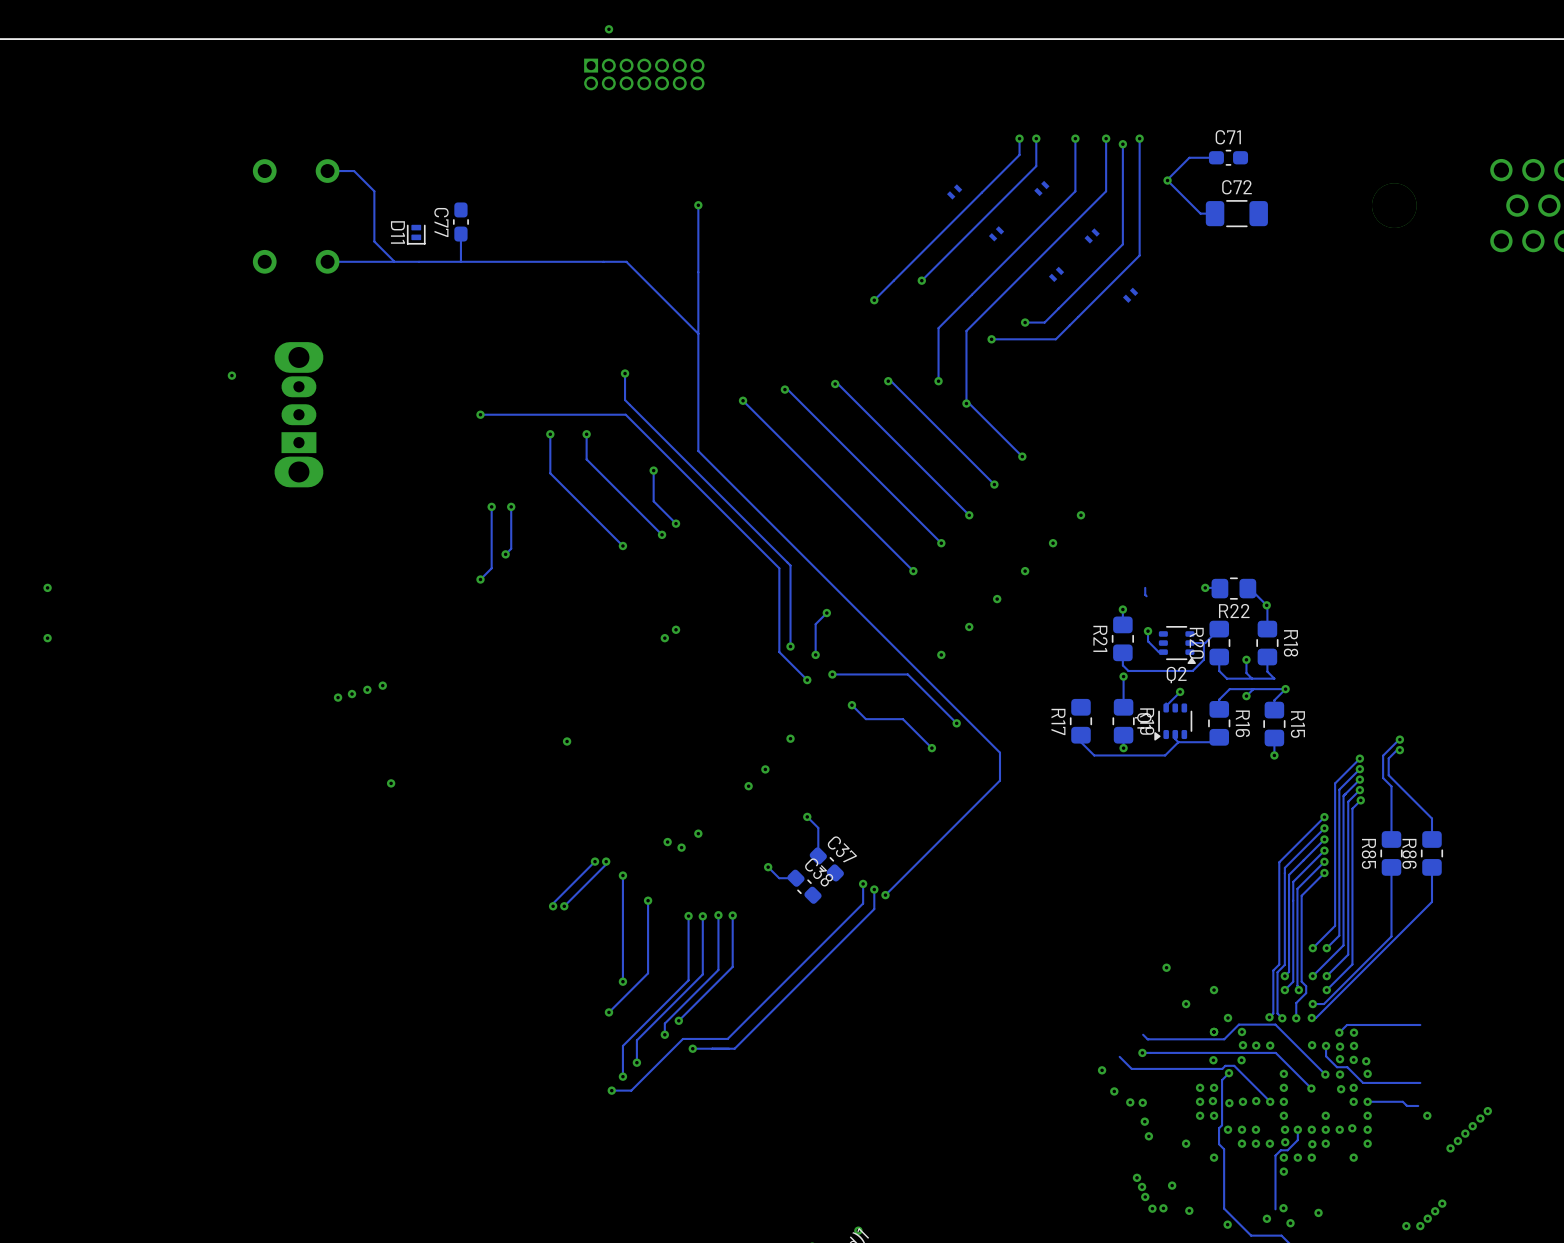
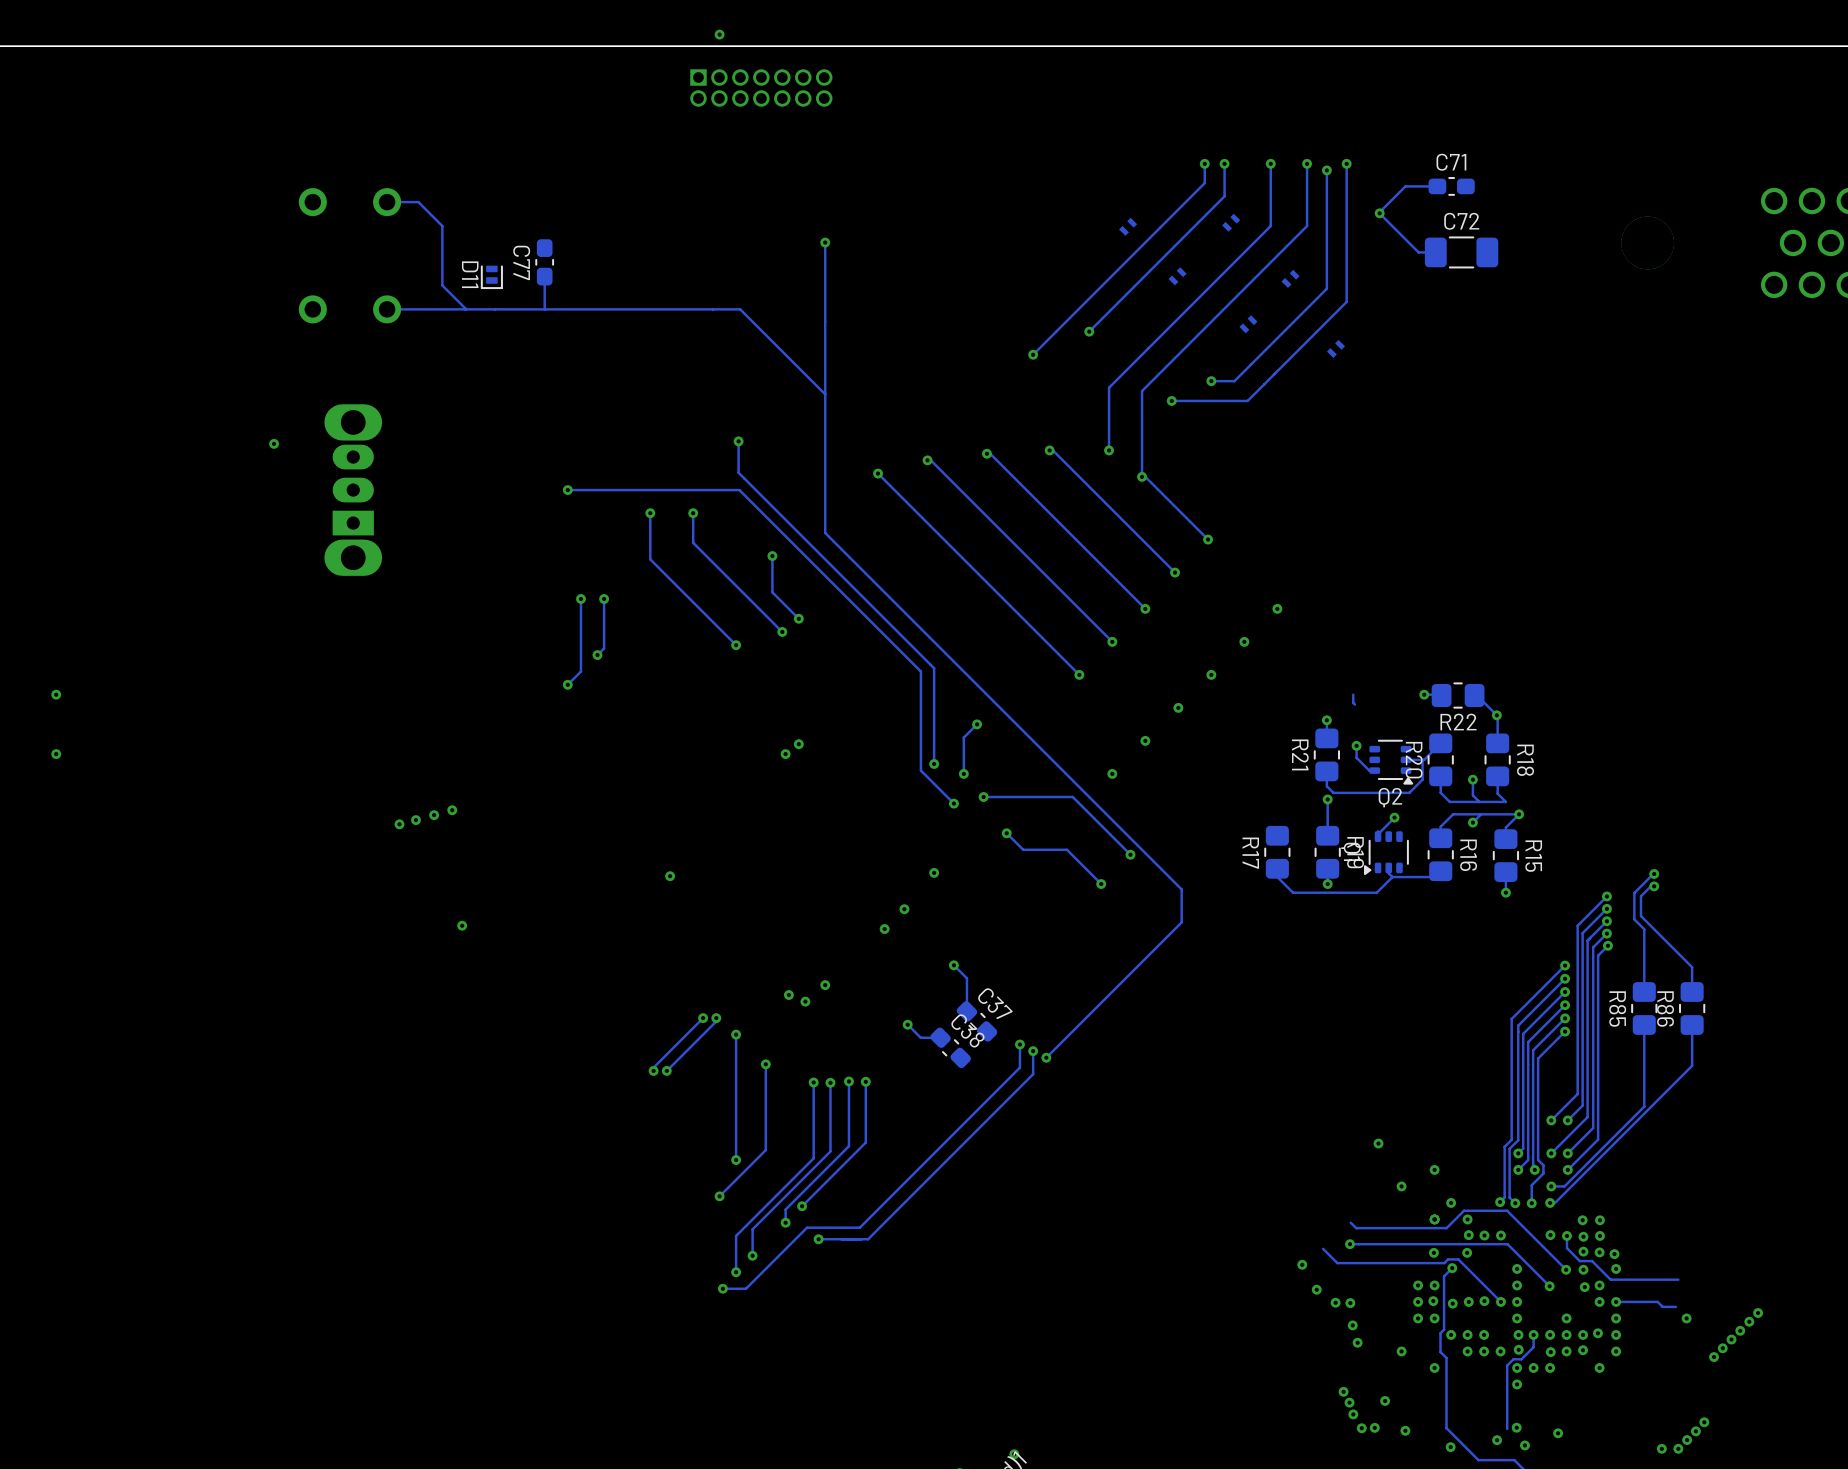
track: (1420, 1024) (1347, 1024) (1339, 1032) -> none
via: none -> (1583, 1350)

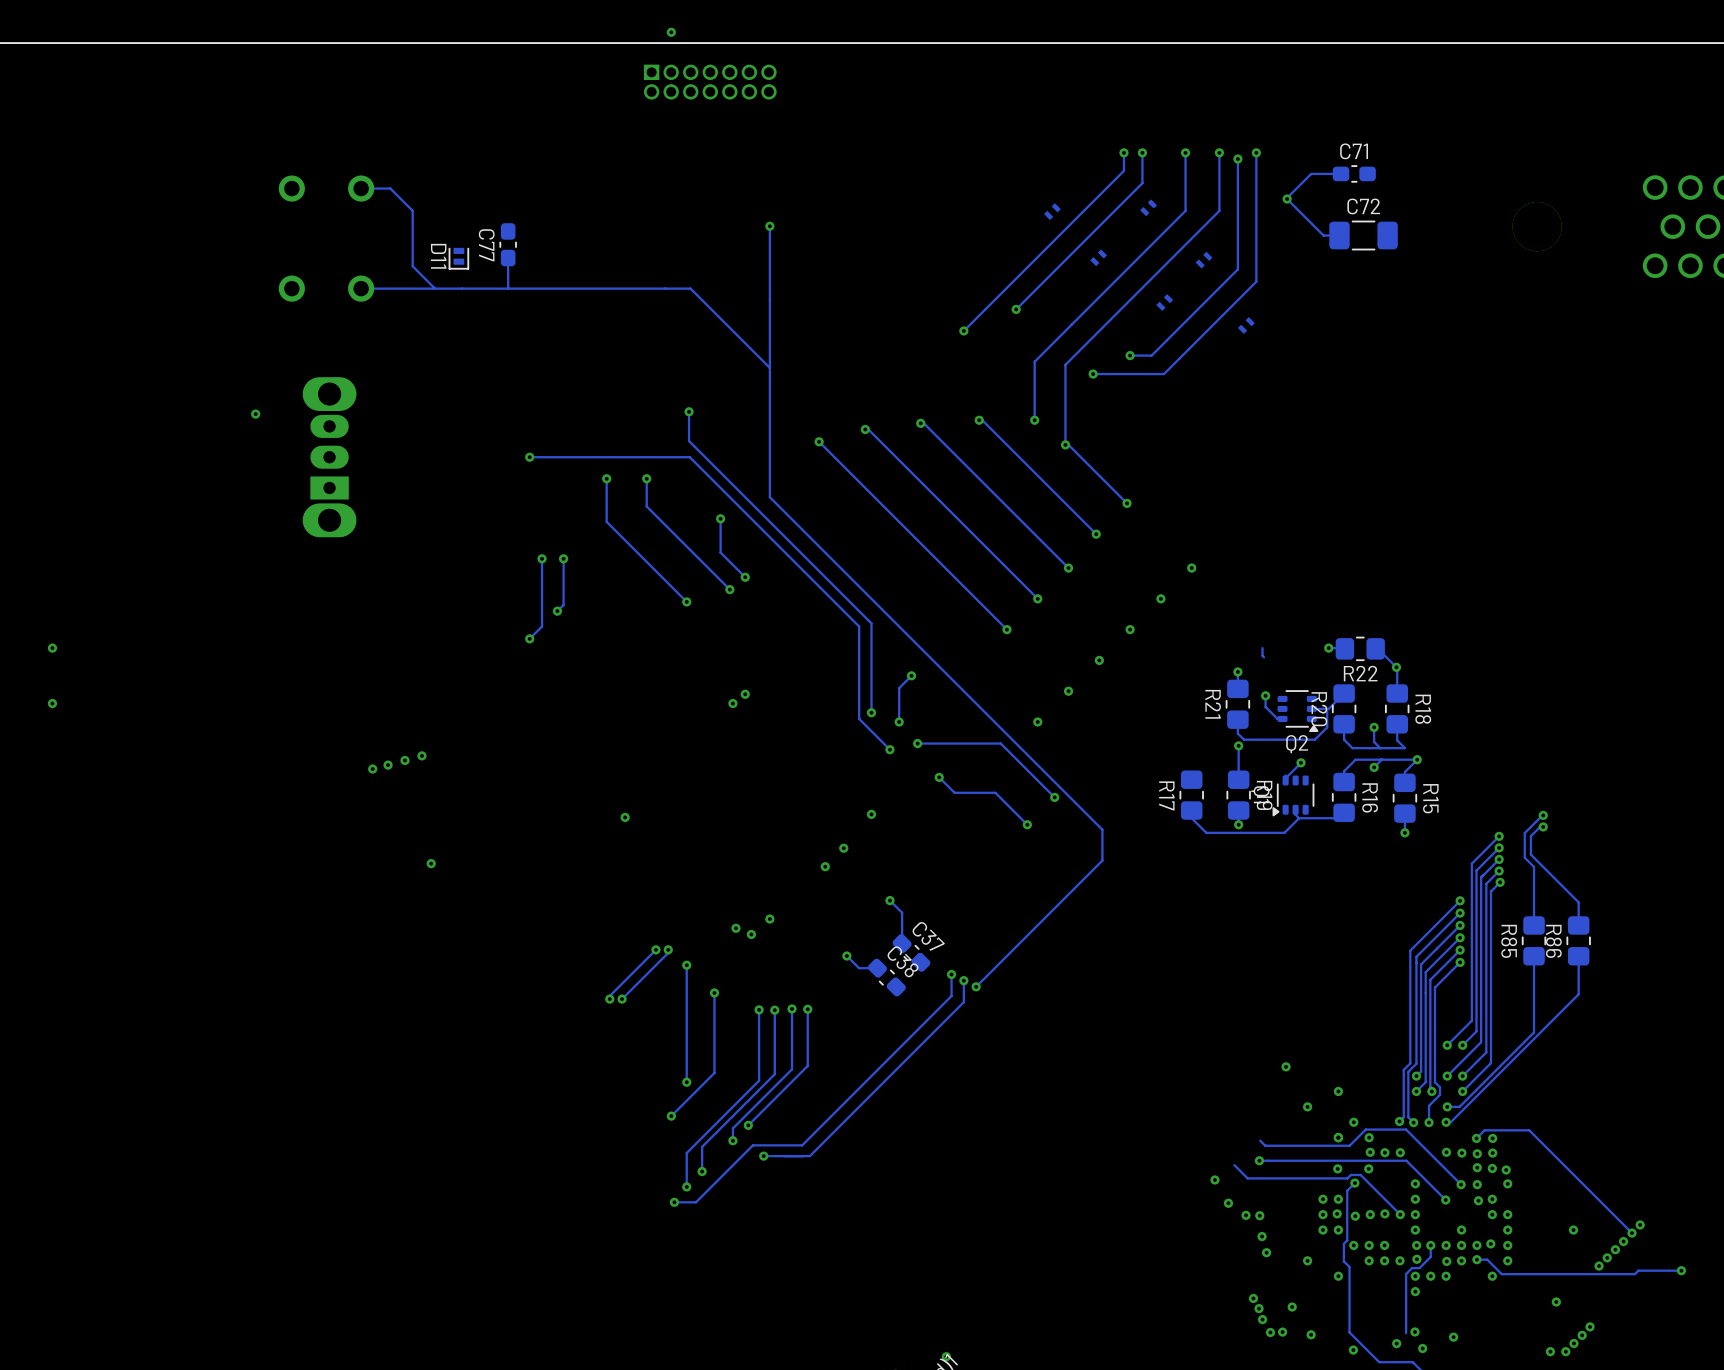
track: none -> (1476, 1138) (1484, 1130) (1529, 1130) (1632, 1233)
track: (1566, 1235) (1566, 1248) (1579, 1261) (1592, 1261) (1610, 1279) (1678, 1279) -> none
track: (1616, 1301) (1657, 1301) (1662, 1306) (1675, 1306) -> none
track: none -> (1476, 1259) (1487, 1259) (1501, 1274) (1634, 1274) (1638, 1270) (1681, 1270)
via: none -> (1681, 1270)
via: none -> (1556, 1301)

